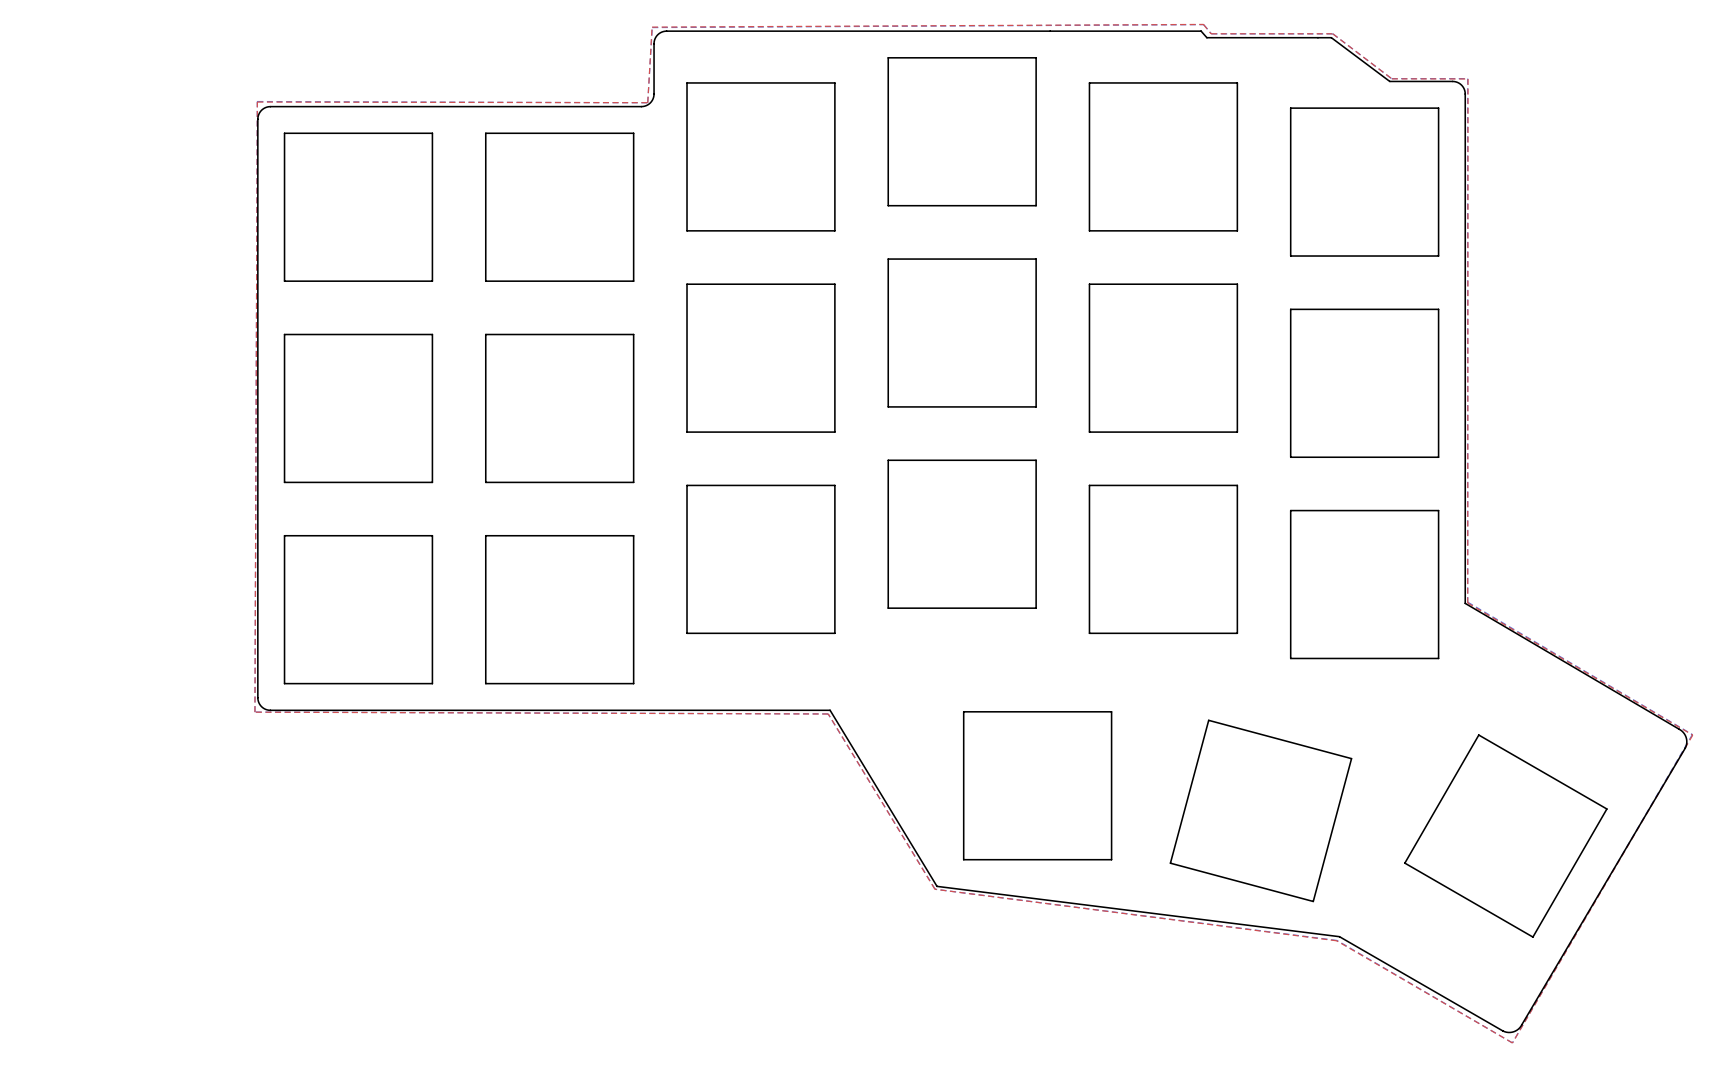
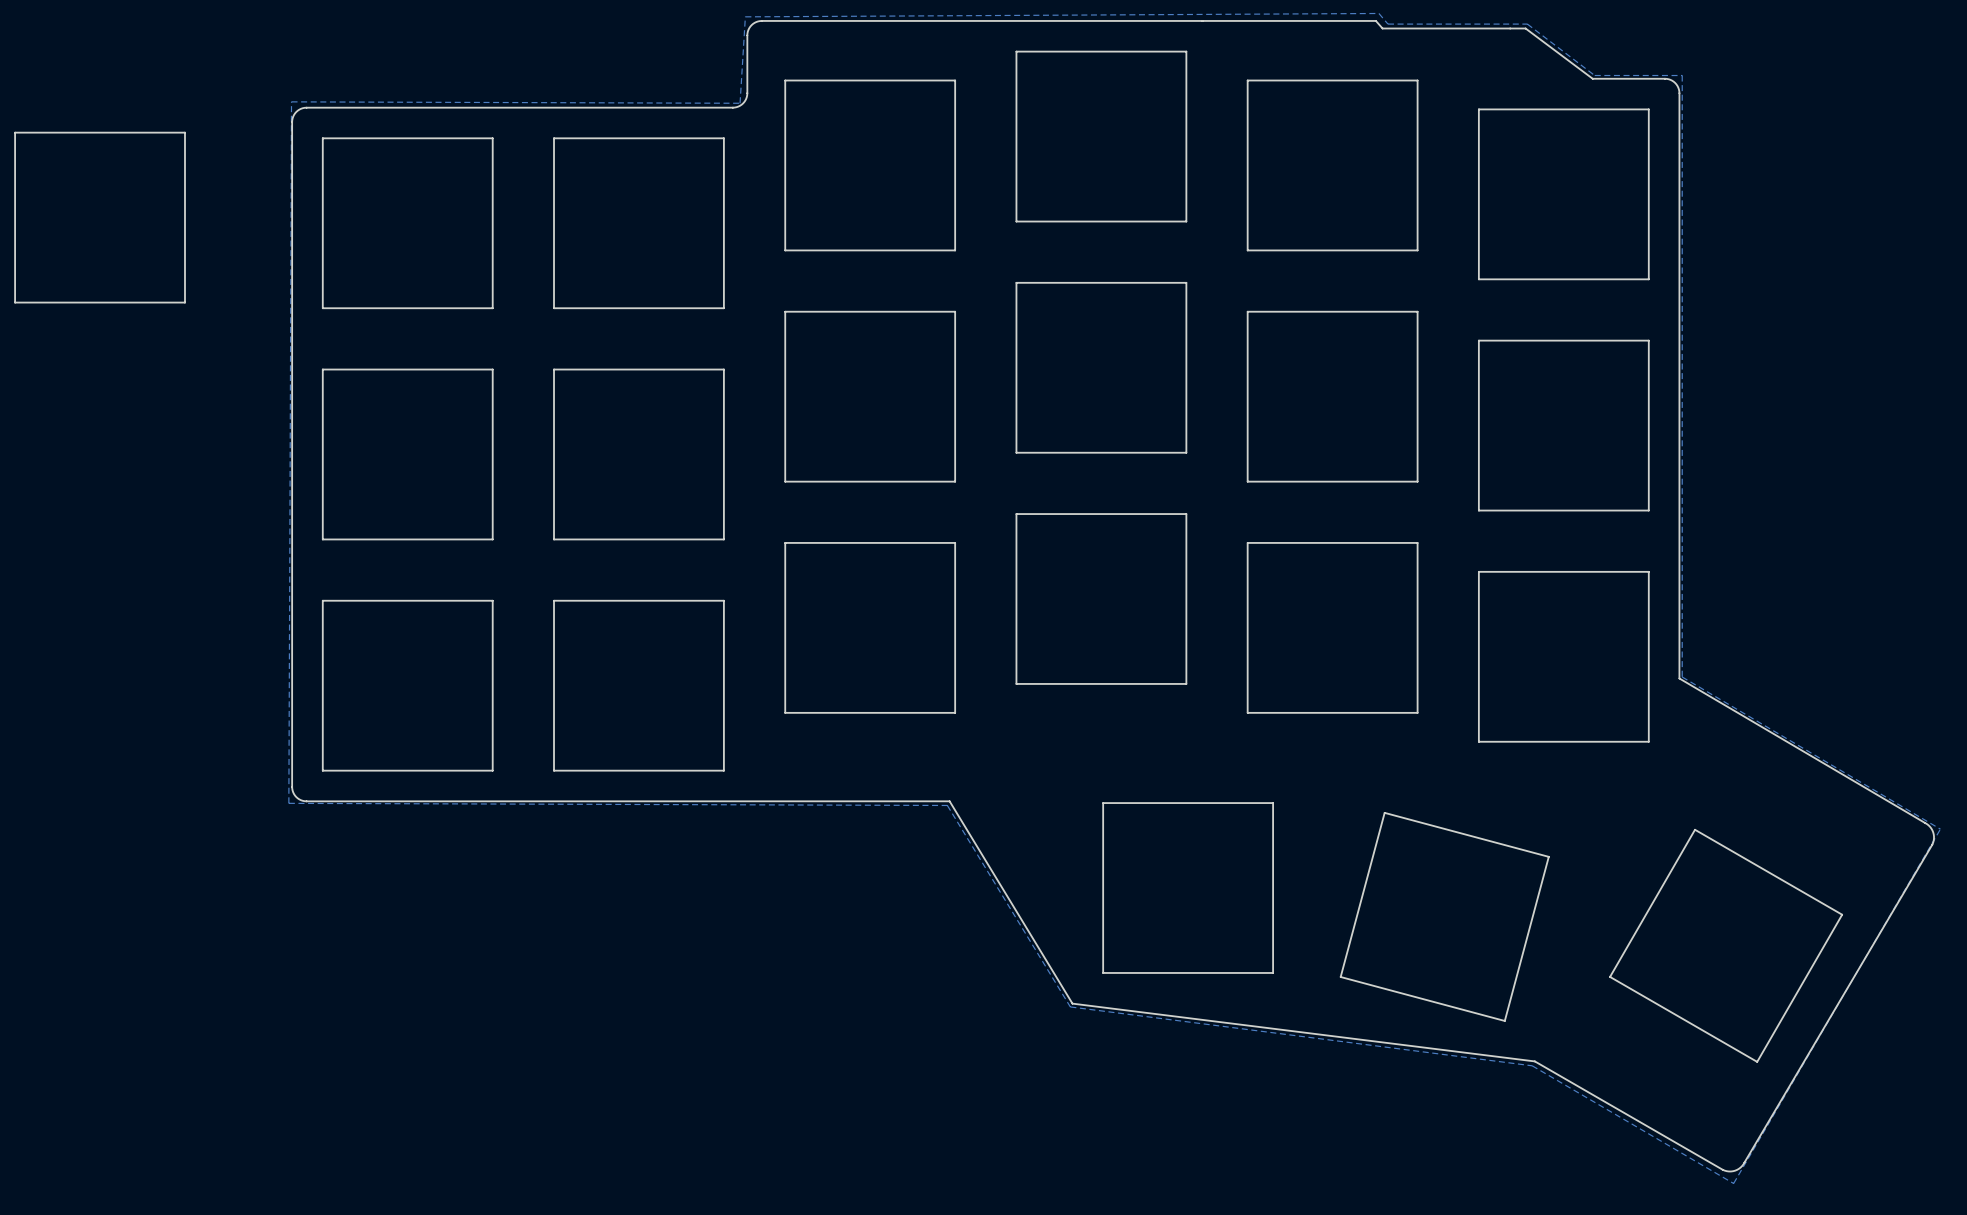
top zone outline: (1203, 24) (652, 27) (647, 102) (257, 102) (254, 712) (828, 714) (934, 889) (1336, 940) (1512, 1042) (1692, 735) (1467, 603) (1468, 78) (1391, 78) (1332, 33) (1211, 33) (1203, 24) -> none
board edge: none -> (15, 132) (15, 302) (185, 302) (185, 132) (15, 132)

